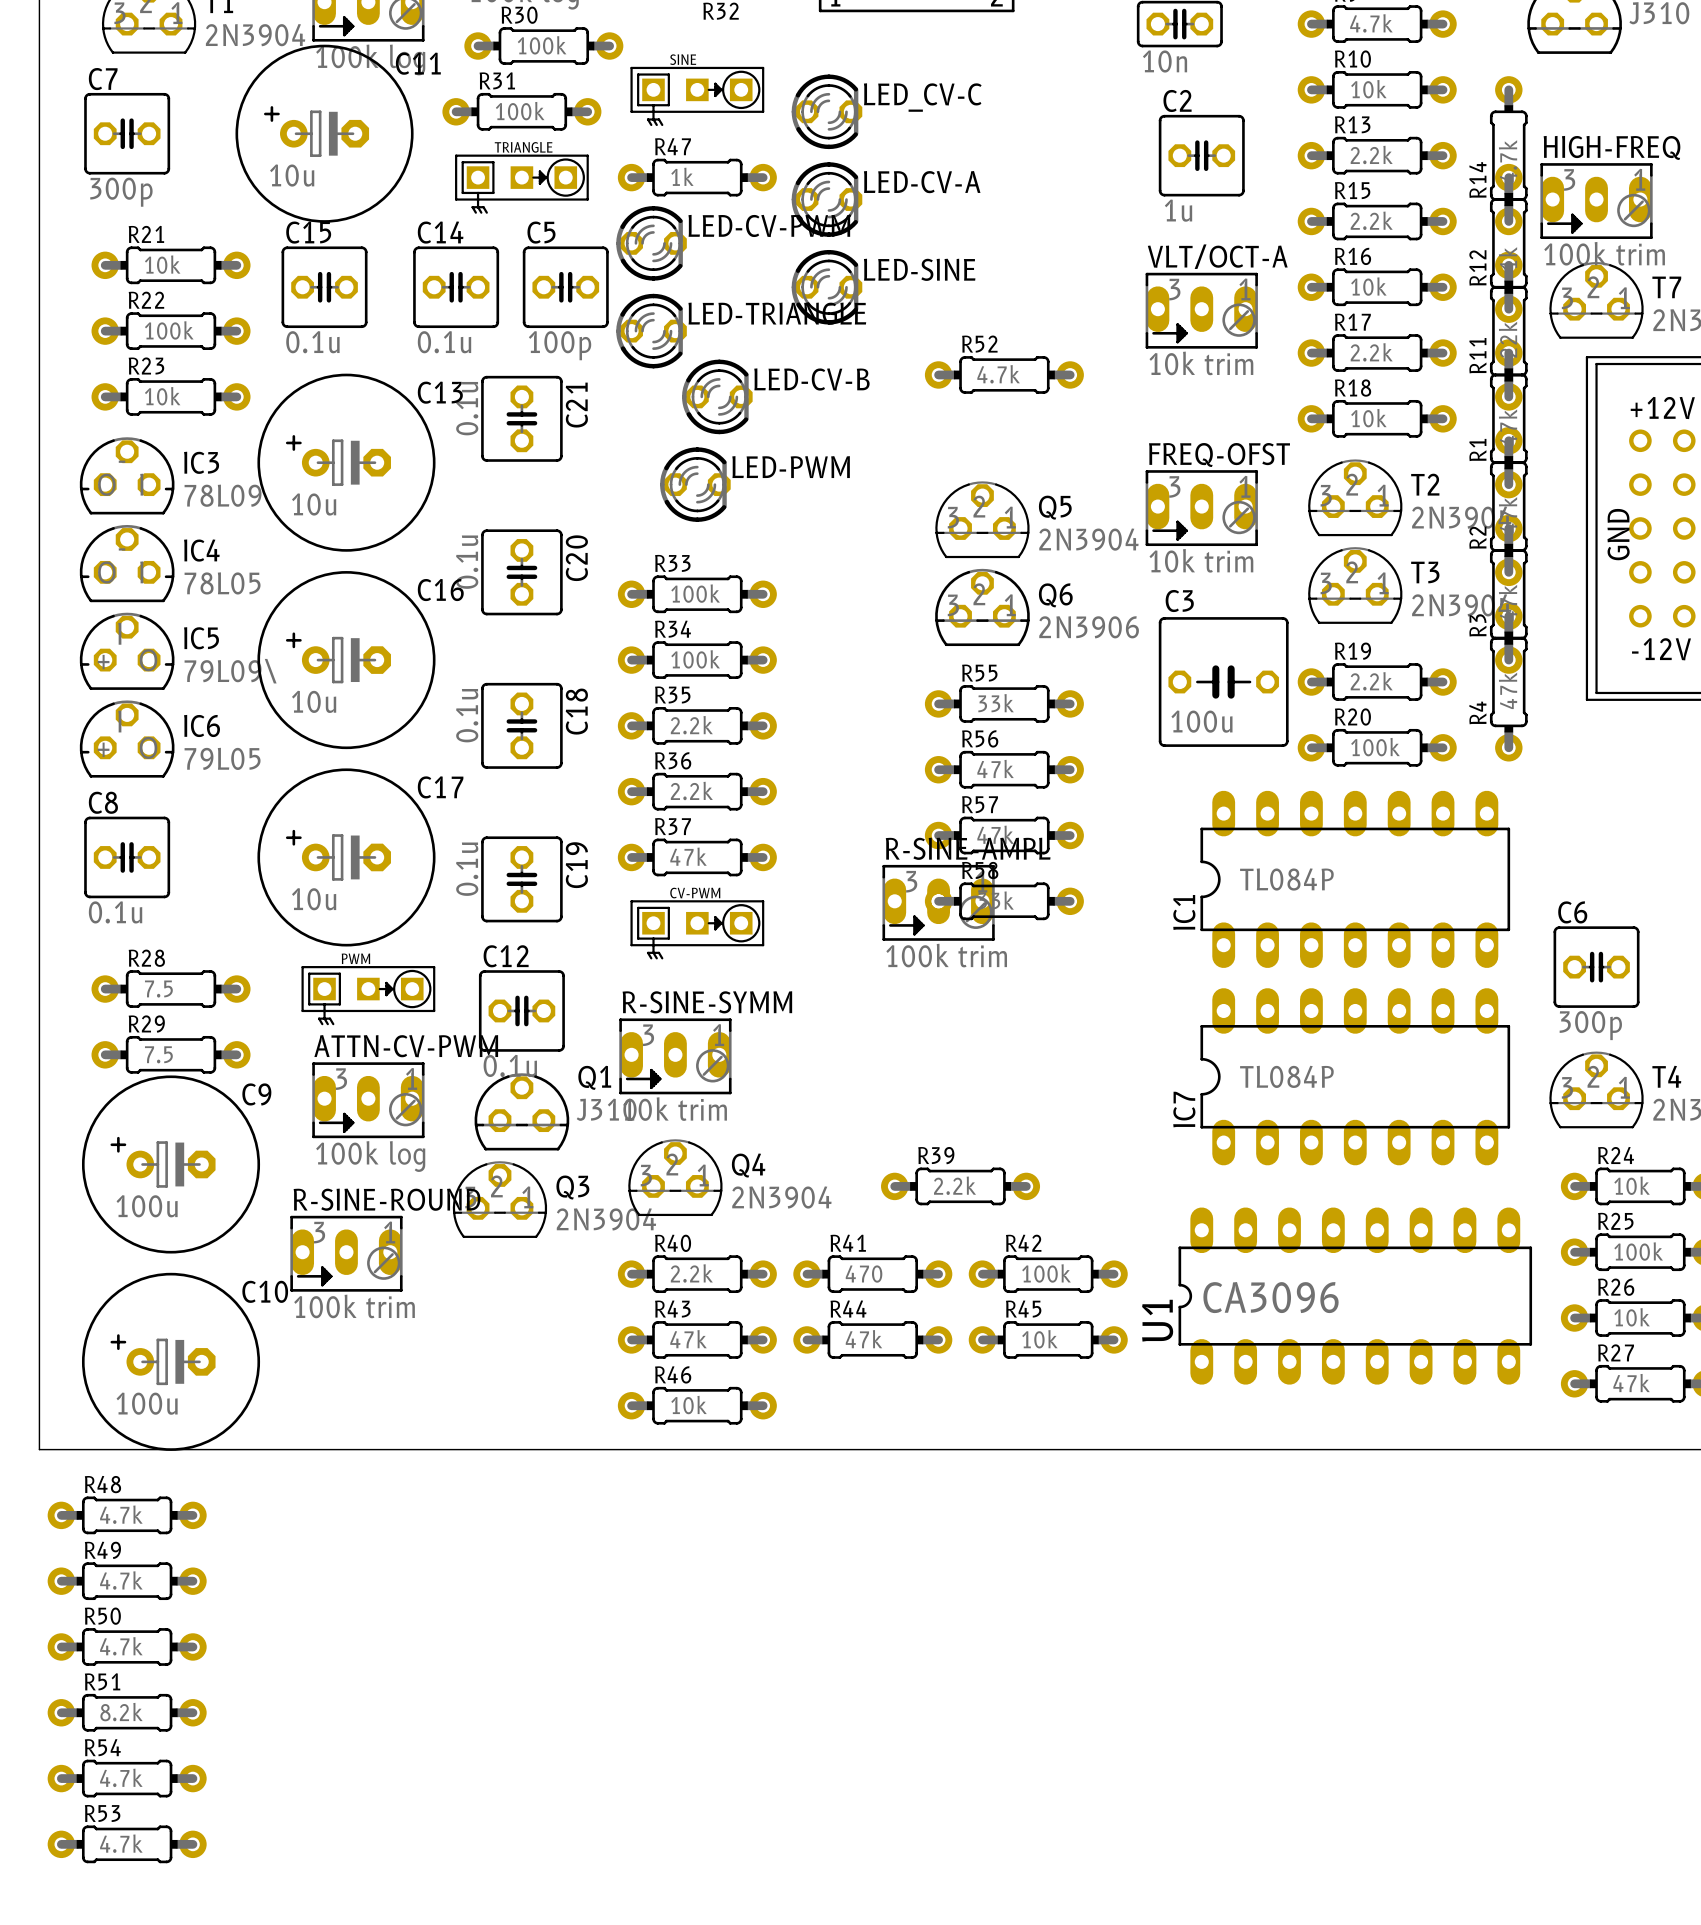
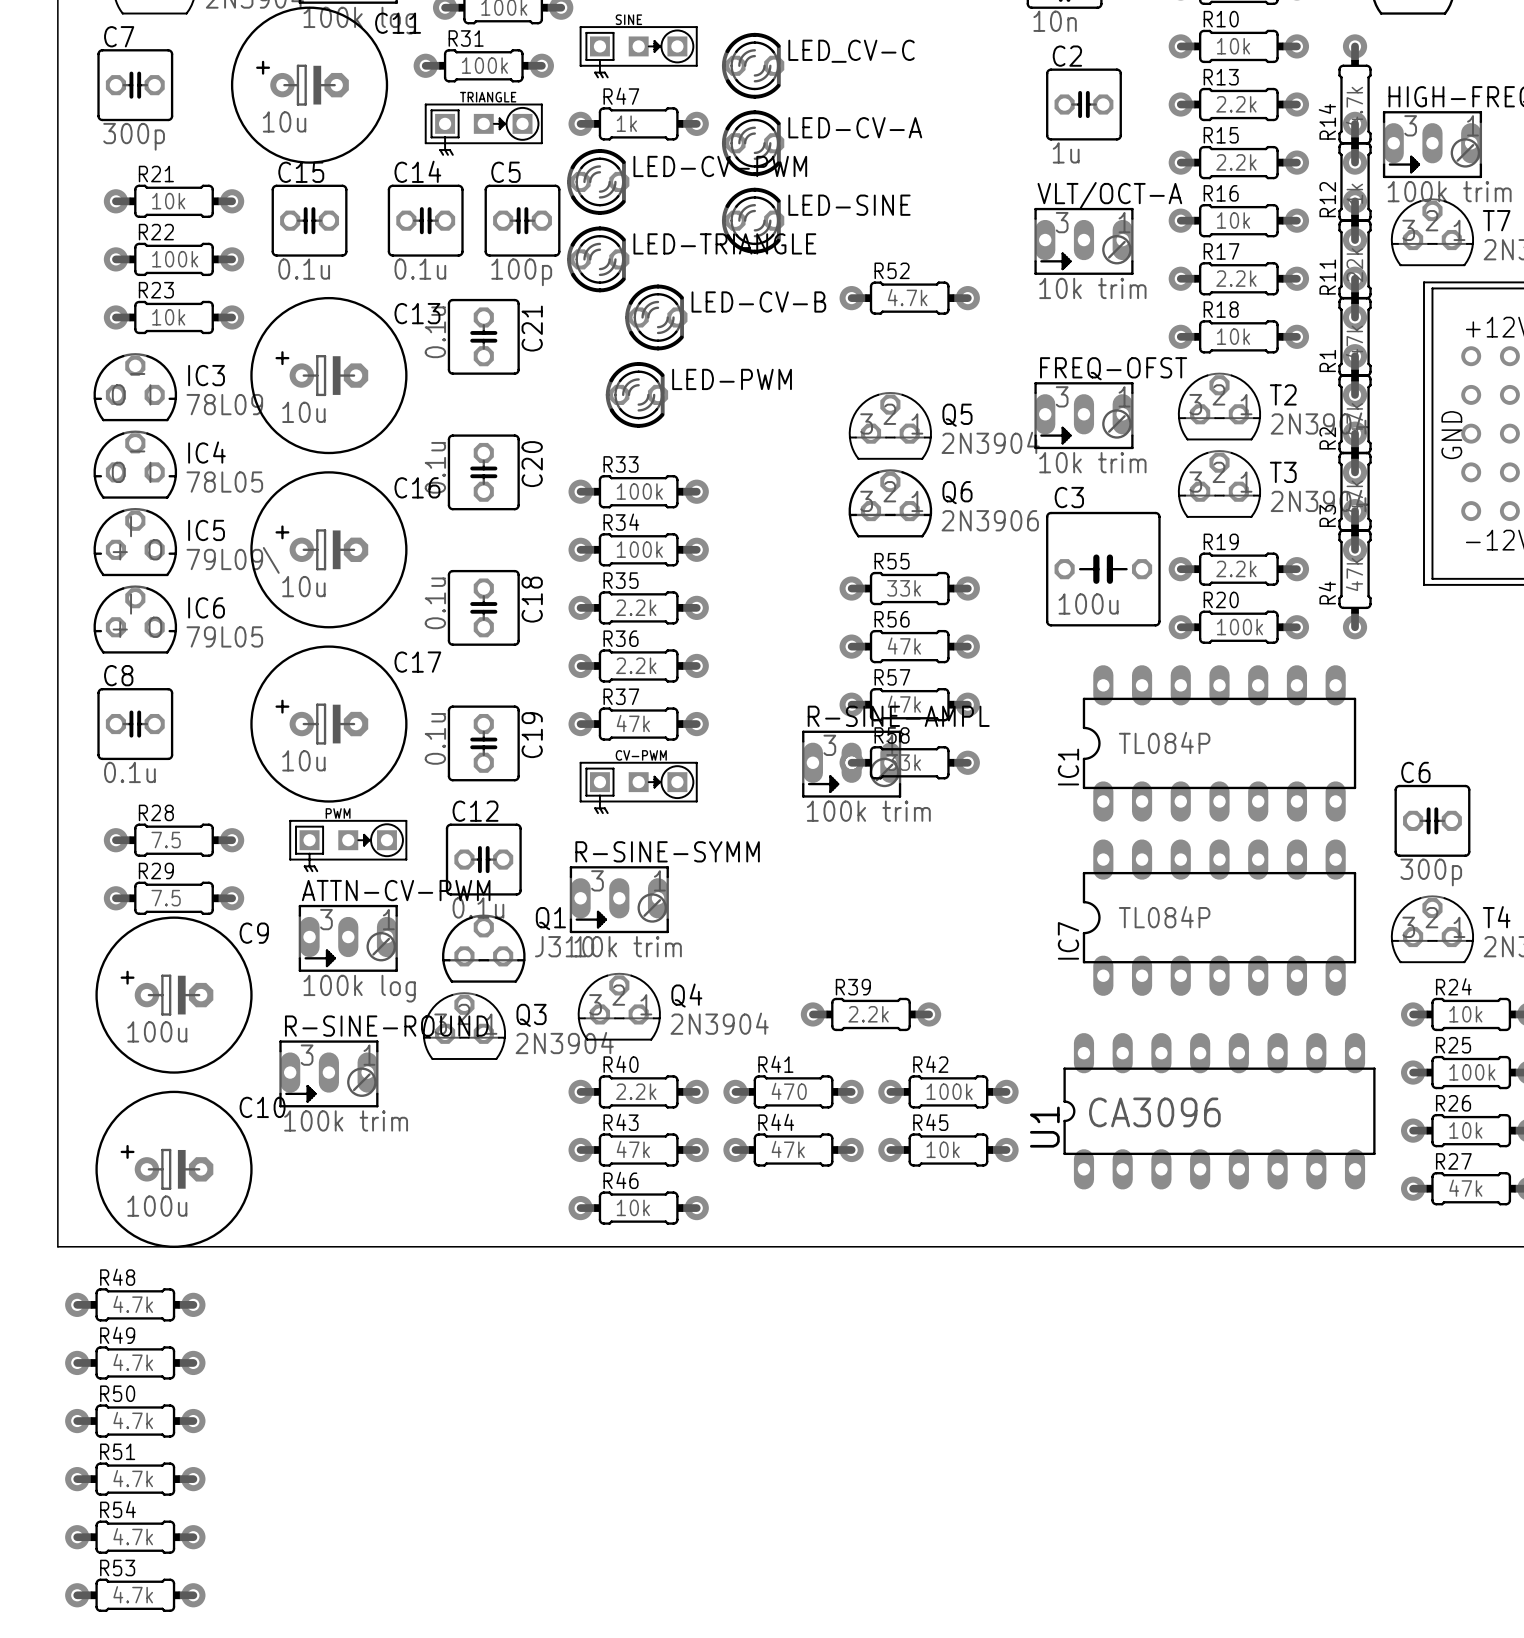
R51 value: 8.2k (121, 1712) -> 4.7k (133, 1478)

